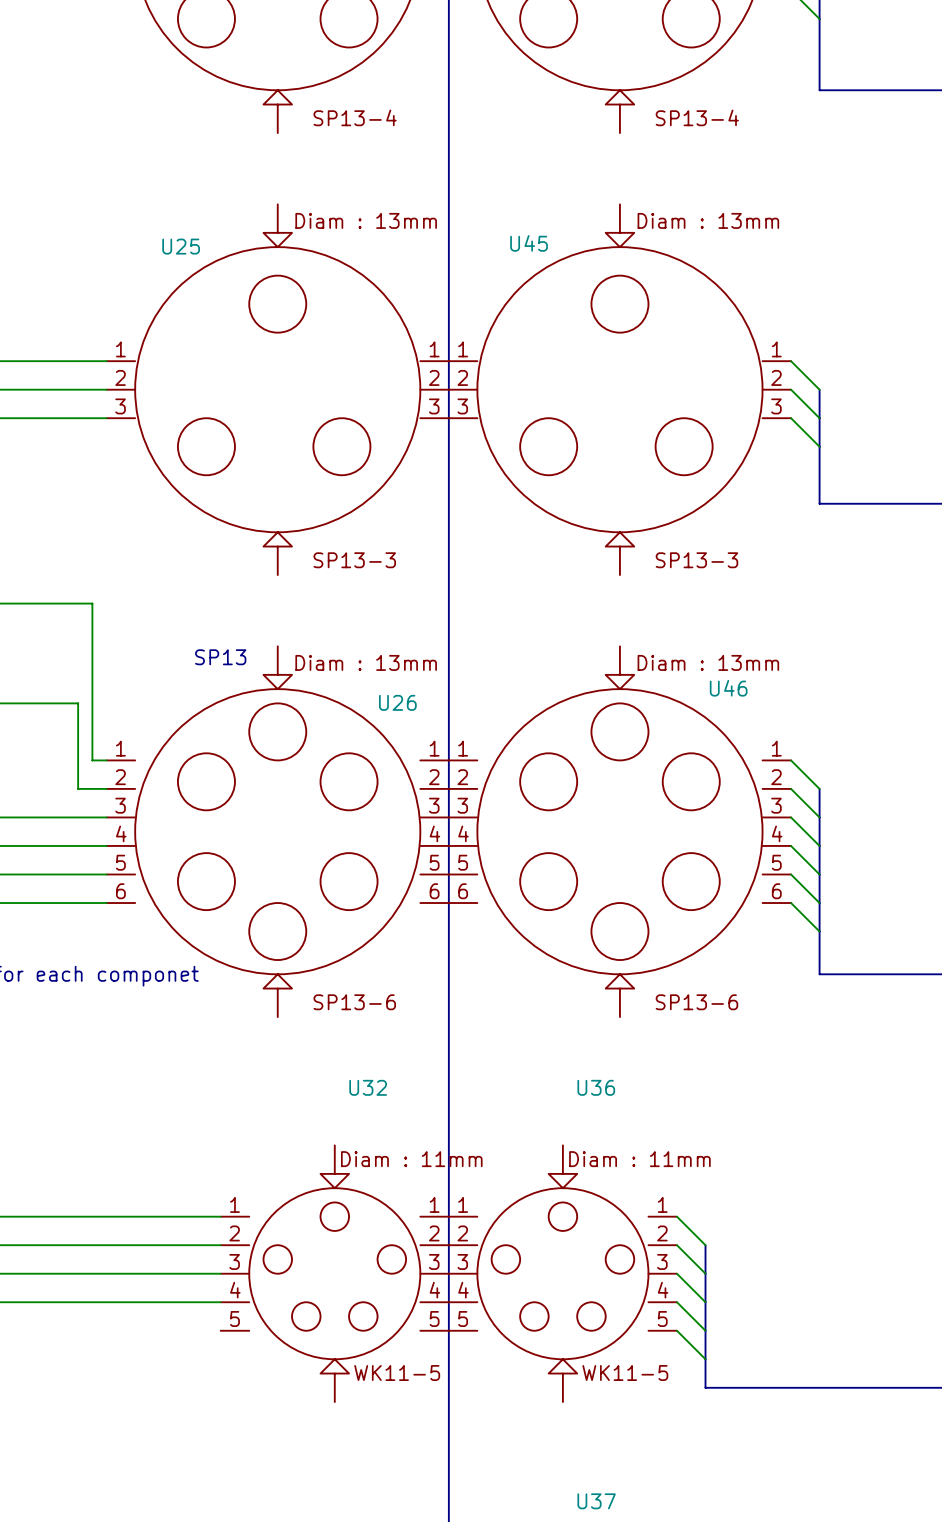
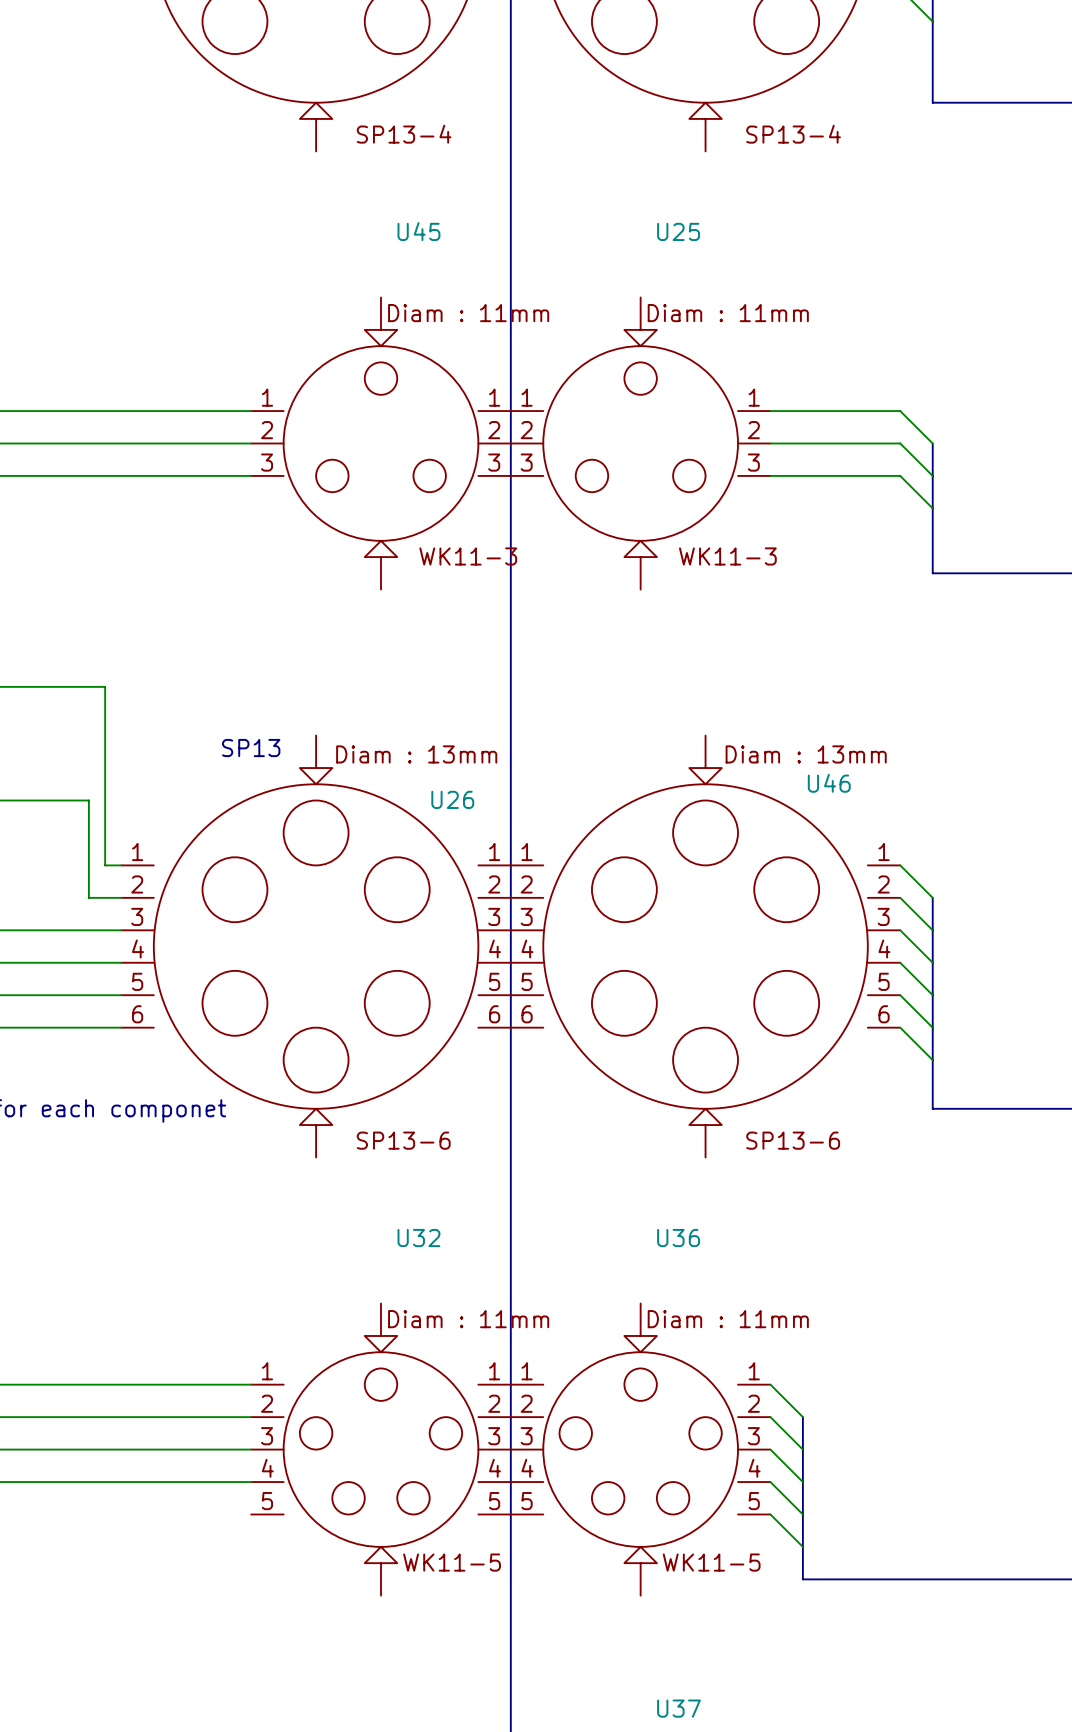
U25 symbol: [106, 204, 449, 576] -> [510, 297, 771, 590]
U45 symbol: [448, 204, 792, 576] -> [251, 297, 511, 590]
U45 name position: U45 (529, 243) -> U45 (418, 231)
U25 name position: U25 (181, 246) -> U25 (678, 231)
wire: none -> (121, 411) (251, 411)
wire: none -> (770, 411) (900, 411)
wire: none -> (121, 443) (251, 443)
wire: none -> (770, 443) (900, 443)
wire: none -> (121, 475) (251, 475)
wire: none -> (770, 475) (900, 475)

